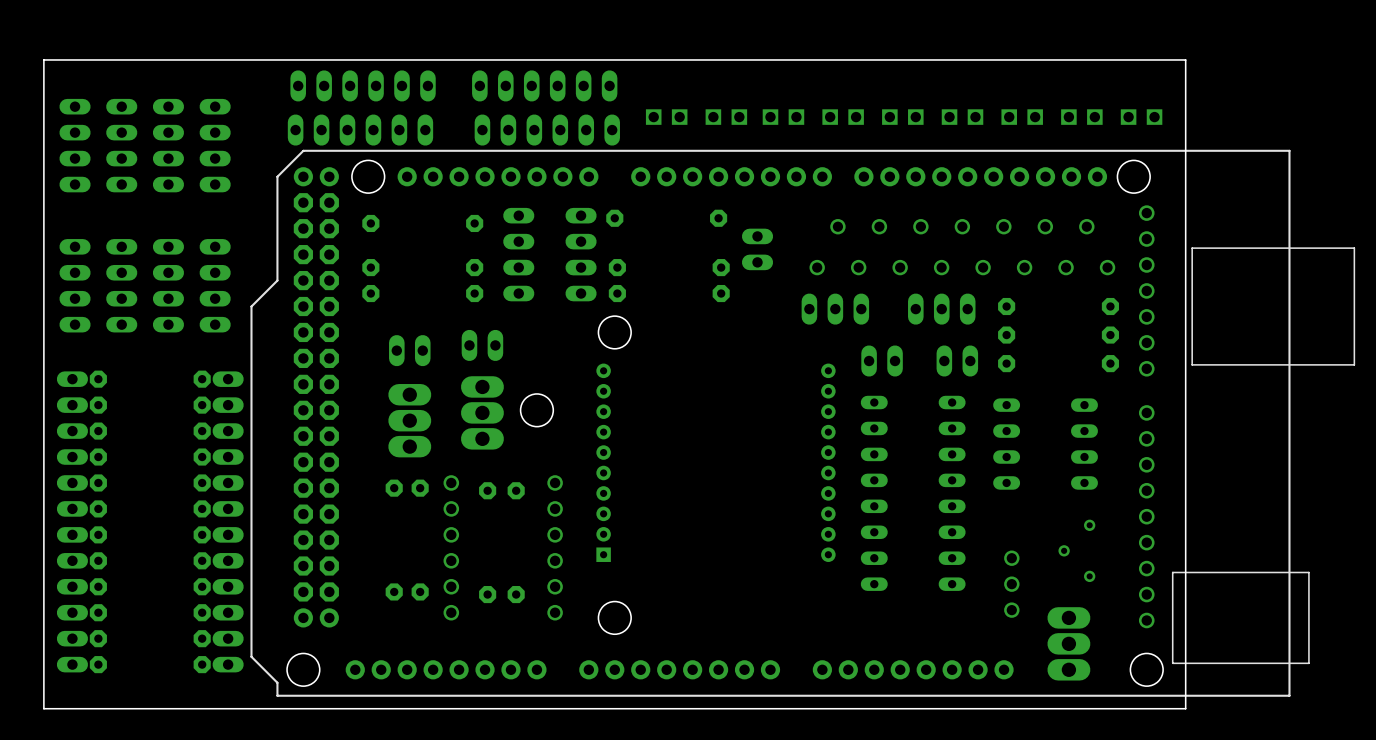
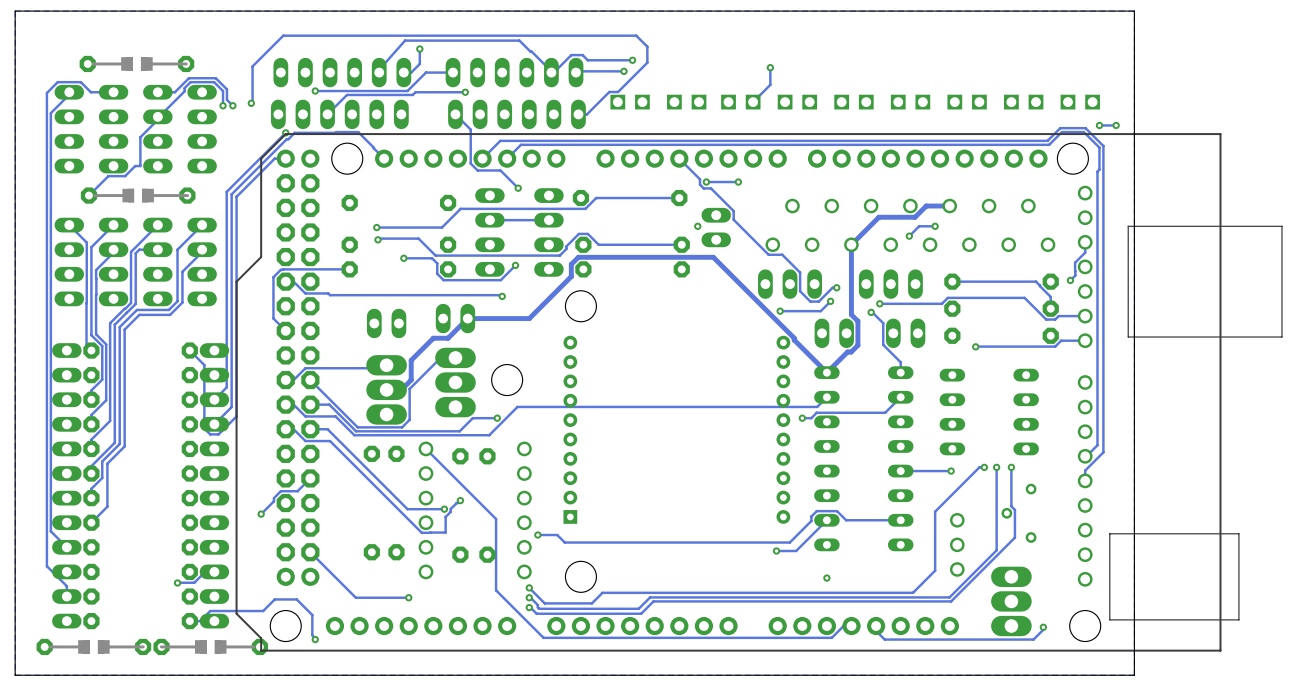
board edge: (1185, 59) (43, 59) (43, 708) (1185, 708) (1185, 59) -> (1134, 11) (1134, 675) (15, 675) (15, 11) (1134, 11)
track: none -> (419, 48) (419, 63) (411, 72) (401, 71)
via: none -> (419, 48)
track: none -> (632, 60) (587, 60) (582, 55) (571, 55) (552, 72) (519, 40) (405, 40) (376, 72)
via: none -> (632, 60)
part: none -> (136, 63)
track: none -> (770, 67) (770, 84) (753, 102)
via: none -> (770, 67)
track: none -> (623, 71) (578, 72)
via: none -> (623, 71)
track: none -> (455, 72) (425, 72) (407, 91) (315, 91)
via: none -> (315, 91)
track: none -> (69, 92) (69, 94) (50, 113) (50, 531) (66, 547)
track: none -> (113, 92) (90, 92) (80, 82) (57, 82) (46, 92) (46, 566) (66, 586) (66, 596)
track: none -> (157, 92) (174, 92) (188, 78) (215, 78) (226, 89) (226, 99) (232, 105)
track: none -> (465, 92) (415, 92) (412, 94) (347, 94) (327, 114)
via: none -> (465, 92)
track: none -> (251, 103) (252, 66) (283, 35) (636, 35) (647, 46) (647, 62) (618, 92) (609, 92) (586, 114) (578, 114)
via: none -> (251, 103)
track: none -> (223, 105) (223, 91) (214, 82) (190, 82) (184, 88) (184, 91) (157, 118)
via: none -> (223, 105)
via: none -> (232, 105)
track: none -> (455, 114) (470, 129) (470, 163) (477, 170) (500, 170) (518, 188)
track: none -> (157, 116) (157, 119) (140, 137) (140, 166) (135, 166) (125, 176) (108, 176) (88, 195)
via: none -> (1099, 125)
track: none -> (1116, 125) (1099, 125)
via: none -> (1116, 125)
track: none -> (285, 132) (226, 191) (226, 387) (214, 399)
via: none -> (285, 132)
track: none -> (285, 158) (274, 158) (236, 196) (236, 416) (218, 434) (210, 434) (204, 428) (204, 365) (189, 350)
track: none -> (384, 158) (358, 132) (294, 132) (231, 194) (231, 407) (214, 424)
track: none -> (482, 158) (500, 140) (1047, 140) (1060, 128) (1085, 128) (1103, 146) (1103, 452) (1085, 470) (1085, 480)
track: none -> (507, 158) (521, 144) (1049, 144) (1061, 132) (1083, 132) (1099, 147) (1099, 169) (1097, 171) (1097, 445) (1085, 456)
track: none -> (679, 158) (700, 179) (700, 184) (703, 188) (711, 188) (733, 211) (733, 219) (768, 254) (782, 254) (800, 272) (800, 291) (810, 301) (818, 301) (832, 287) (836, 287)
via: none -> (706, 182)
track: none -> (738, 182) (706, 182)
via: none -> (738, 182)
via: none -> (518, 188)
part: none -> (138, 195)
track: none -> (679, 198) (596, 198) (585, 208) (460, 208) (441, 227) (376, 227)
track: none -> (949, 206) (926, 206) (915, 217) (878, 217) (851, 244) (851, 314) (857, 321) (857, 345) (851, 352) (847, 352) (826, 372) (713, 257) (578, 257) (571, 264) (571, 276) (529, 318) (467, 318) (448, 338) (433, 338) (411, 360) (411, 380) (401, 389) (386, 389)
track: none -> (548, 220) (489, 220)
track: none -> (69, 225) (86, 242) (86, 345) (91, 350)
track: none -> (113, 225) (91, 247) (91, 335) (102, 346) (102, 379) (91, 390) (91, 399)
track: none -> (157, 225) (131, 251) (131, 303) (110, 323) (110, 420) (91, 439) (91, 448)
track: none -> (202, 225) (177, 249) (177, 301) (168, 309) (136, 309) (119, 327) (119, 444) (102, 461) (102, 478) (91, 488) (91, 498)
via: none -> (697, 226)
track: none -> (935, 226) (919, 226) (909, 236)
via: none -> (935, 226)
via: none -> (376, 227)
via: none -> (909, 236)
track: none -> (378, 239) (418, 238) (435, 255) (559, 255) (578, 233) (587, 233) (598, 244) (681, 244)
via: none -> (378, 239)
track: none -> (1085, 242) (1085, 252) (1075, 262) (1075, 275) (1070, 280)
track: none -> (113, 249) (113, 252) (96, 270) (96, 334) (106, 344) (106, 400) (91, 415) (91, 424)
track: none -> (157, 249) (139, 249) (135, 253) (135, 303) (126, 312)
track: none -> (202, 249) (202, 252) (182, 271) (182, 302) (170, 314) (139, 314) (124, 329) (124, 446) (107, 463) (107, 506) (91, 522)
track: none -> (403, 258) (432, 258) (437, 263) (437, 273) (443, 280) (500, 280) (516, 264)
via: none -> (403, 258)
via: none -> (515, 265)
track: none -> (349, 269) (280, 269) (273, 277) (273, 318) (285, 330)
via: none -> (1070, 280)
track: none -> (285, 281) (293, 281) (305, 293) (328, 293) (330, 295) (502, 296)
track: none -> (952, 281) (1036, 281) (1050, 296) (1050, 308)
via: none -> (836, 287)
via: none -> (502, 296)
track: none -> (830, 301) (820, 311) (780, 311)
via: none -> (830, 301)
track: none -> (879, 303) (941, 303) (947, 297) (1024, 297) (1046, 319) (1055, 319) (1058, 316) (1085, 316)
via: none -> (879, 303)
via: none -> (780, 311)
track: none -> (871, 312) (883, 323) (883, 344) (900, 362) (900, 372)
via: none -> (871, 312)
track: none -> (126, 312) (114, 324) (114, 442) (91, 466) (91, 473)
track: none -> (1085, 340) (1061, 340) (1055, 346) (975, 346)
via: none -> (975, 346)
track: none -> (455, 357) (440, 357) (409, 388) (409, 419) (402, 427) (357, 427) (310, 380)
track: none -> (386, 365) (383, 368) (305, 368) (293, 380) (285, 380)
track: none -> (826, 397) (817, 406) (517, 406) (489, 435) (354, 435) (335, 416) (305, 416) (293, 404) (285, 404)
track: none -> (900, 397) (885, 412) (816, 412) (811, 418) (802, 418)
track: none -> (310, 404) (329, 404) (356, 431) (459, 431) (472, 418) (497, 418)
via: none -> (497, 418)
via: none -> (802, 418)
track: none -> (285, 429) (293, 429) (305, 441) (330, 441) (421, 532) (445, 532) (445, 516) (450, 511) (450, 508) (460, 500)
track: none -> (310, 429) (327, 429) (407, 509) (444, 509)
track: none -> (425, 448) (496, 519) (496, 590) (543, 637) (831, 637) (843, 626) (851, 626)
track: none -> (984, 467) (979, 467) (935, 511) (935, 570) (913, 592) (602, 592) (591, 603) (544, 603) (529, 587)
via: none -> (984, 467)
track: none -> (996, 467) (996, 550) (949, 597) (650, 597) (638, 608) (539, 608) (537, 605) (529, 597)
via: none -> (996, 467)
track: none -> (1011, 467) (1011, 506) (1014, 509) (1014, 537) (951, 601) (653, 601) (641, 613) (536, 613) (529, 607)
via: none -> (1011, 467)
track: none -> (951, 471) (900, 471)
via: none -> (951, 471)
track: none -> (310, 478) (297, 491) (280, 491) (261, 514)
via: none -> (460, 500)
via: none -> (444, 509)
via: none -> (261, 514)
track: none -> (826, 520) (796, 551) (776, 551)
track: none -> (900, 520) (846, 520) (837, 511) (816, 511) (811, 516) (811, 520) (789, 542) (564, 542) (557, 535) (537, 535)
via: none -> (537, 535)
via: none -> (776, 551)
track: none -> (310, 552) (355, 597) (408, 597)
track: none -> (214, 571) (205, 571) (194, 582) (177, 582)
via: none -> (826, 578)
via: none -> (177, 582)
via: none -> (529, 587)
via: none -> (408, 597)
via: none -> (529, 597)
via: none -> (529, 607)
track: none -> (189, 621) (200, 621) (210, 611) (263, 611) (274, 599) (296, 599) (312, 615) (312, 635) (315, 639)
track: none -> (876, 626) (876, 630) (884, 639) (1033, 639) (1044, 628) (1043, 627)
via: none -> (1043, 627)
via: none -> (315, 639)
part: none -> (93, 646)
part: none -> (210, 646)

